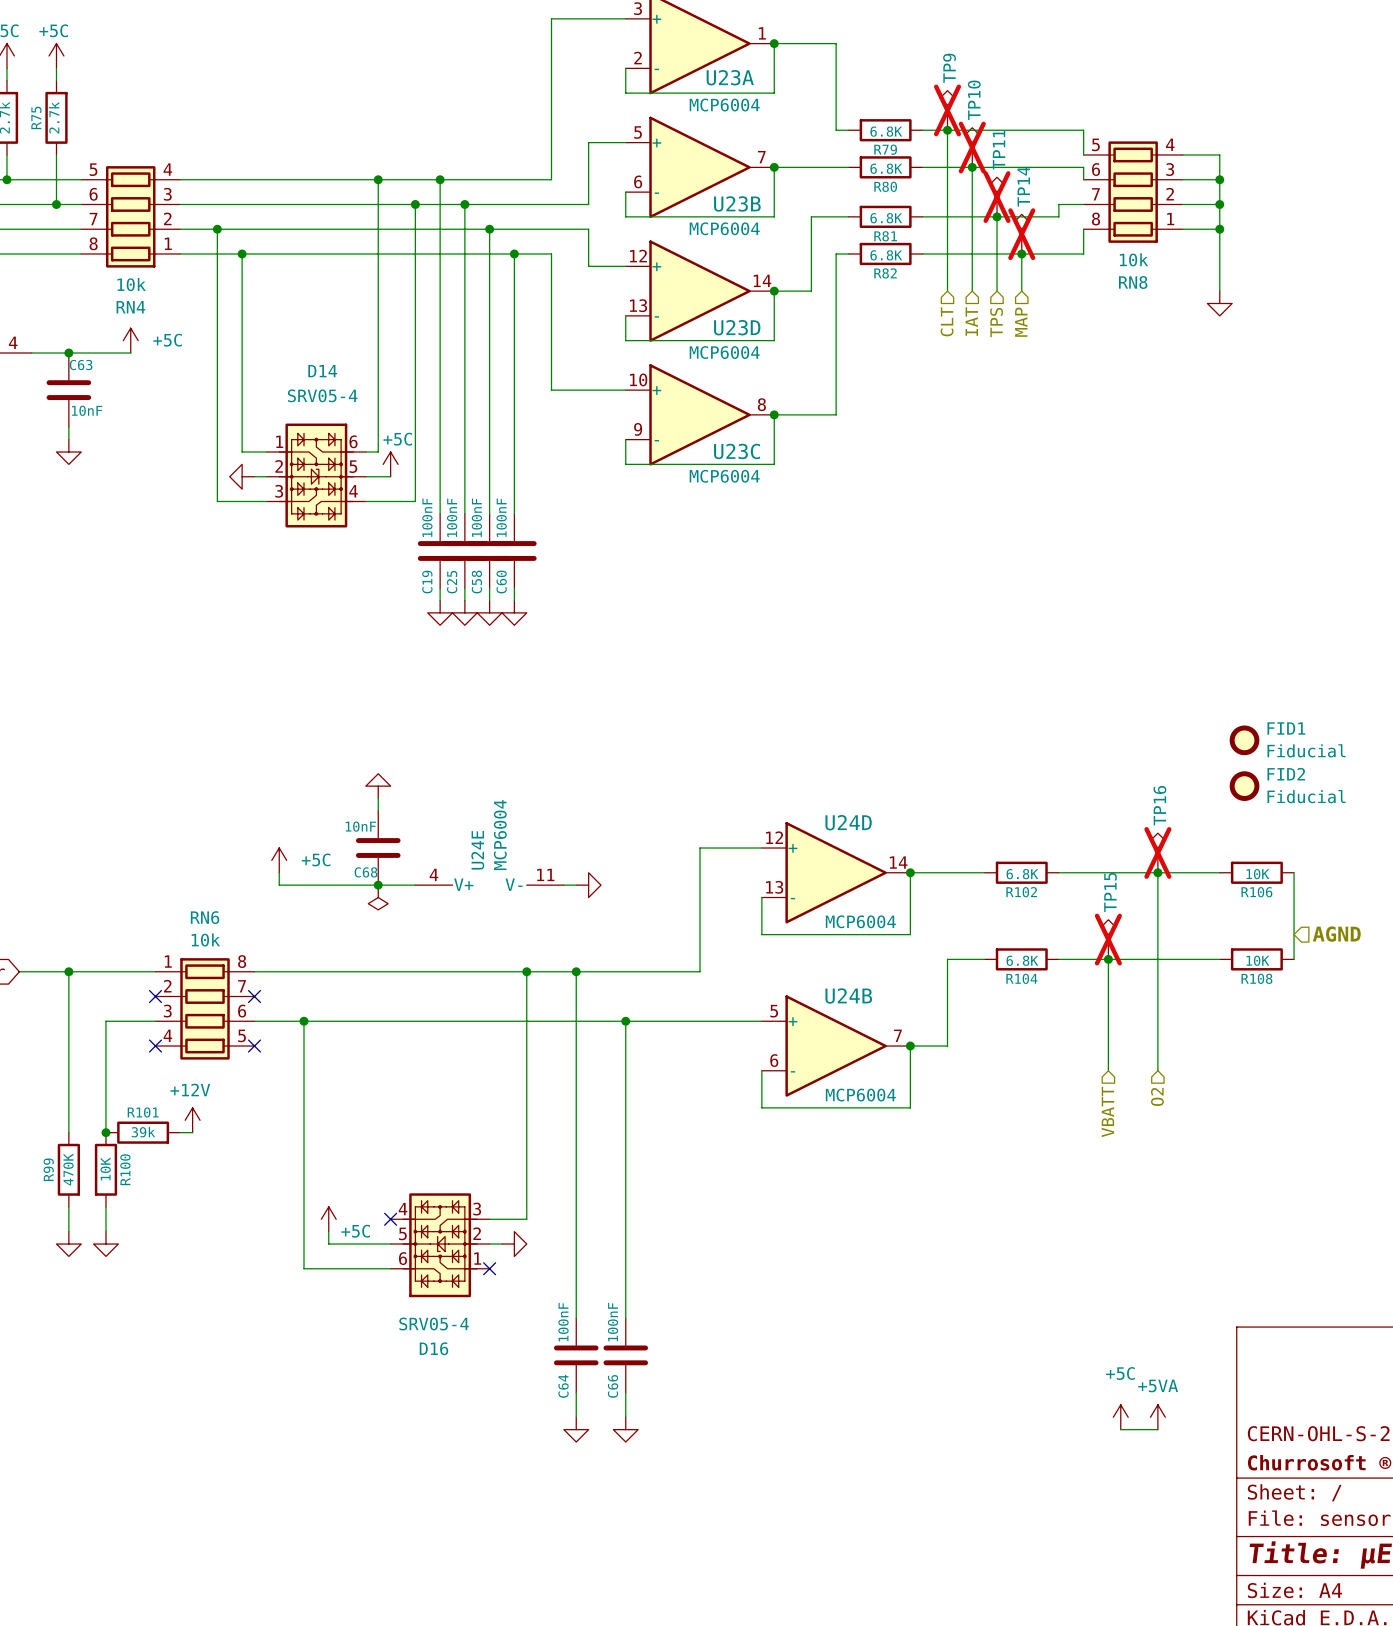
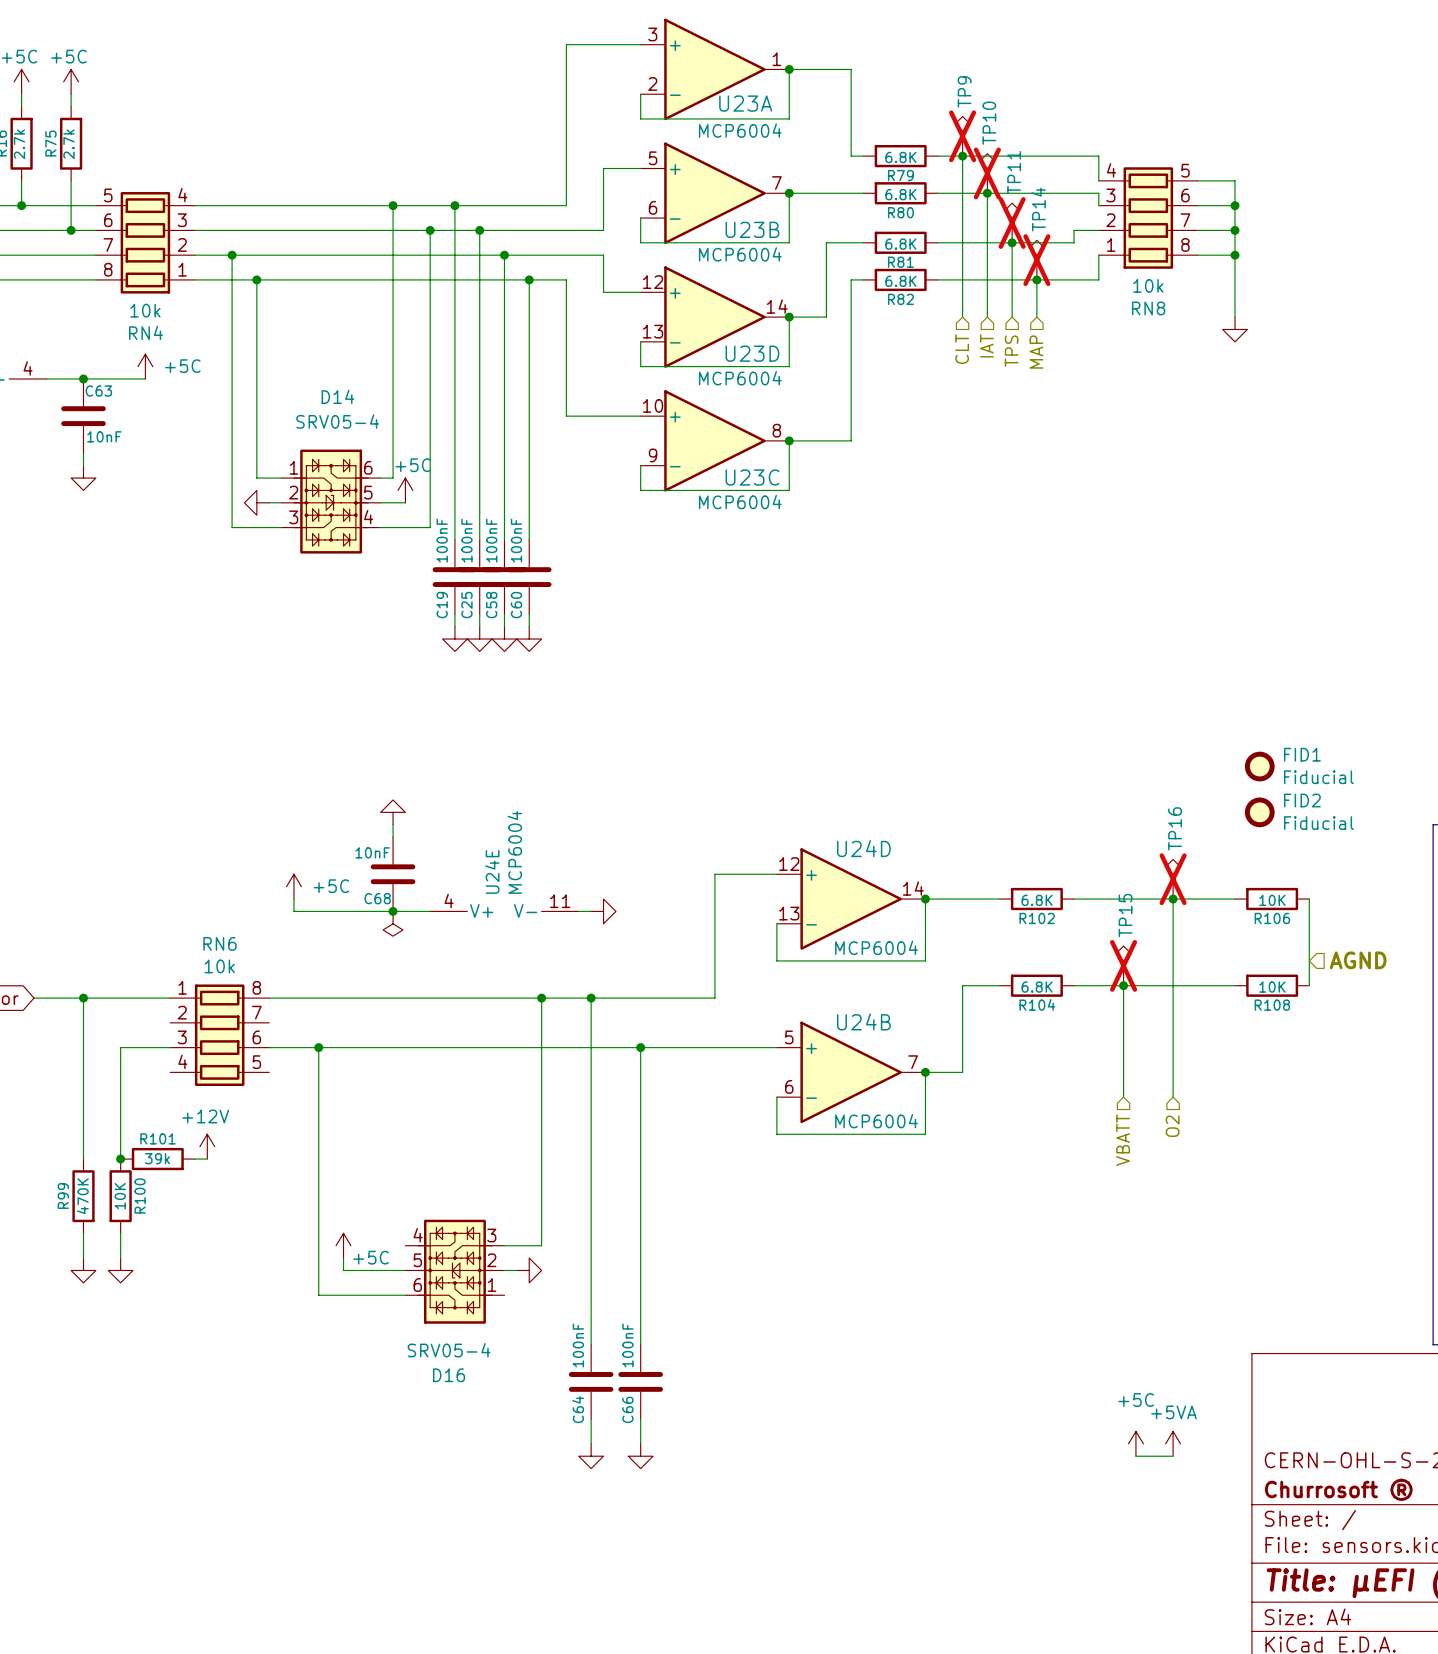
RN8 flip: as is (1133, 192) -> left-right (1148, 218)
no-connect mark: (155, 996) -> none
no-connect mark: (254, 996) -> none
no-connect mark: (155, 1046) -> none
no-connect mark: (254, 1046) -> none
no-connect mark: (390, 1219) -> none
no-connect mark: (489, 1268) -> none

